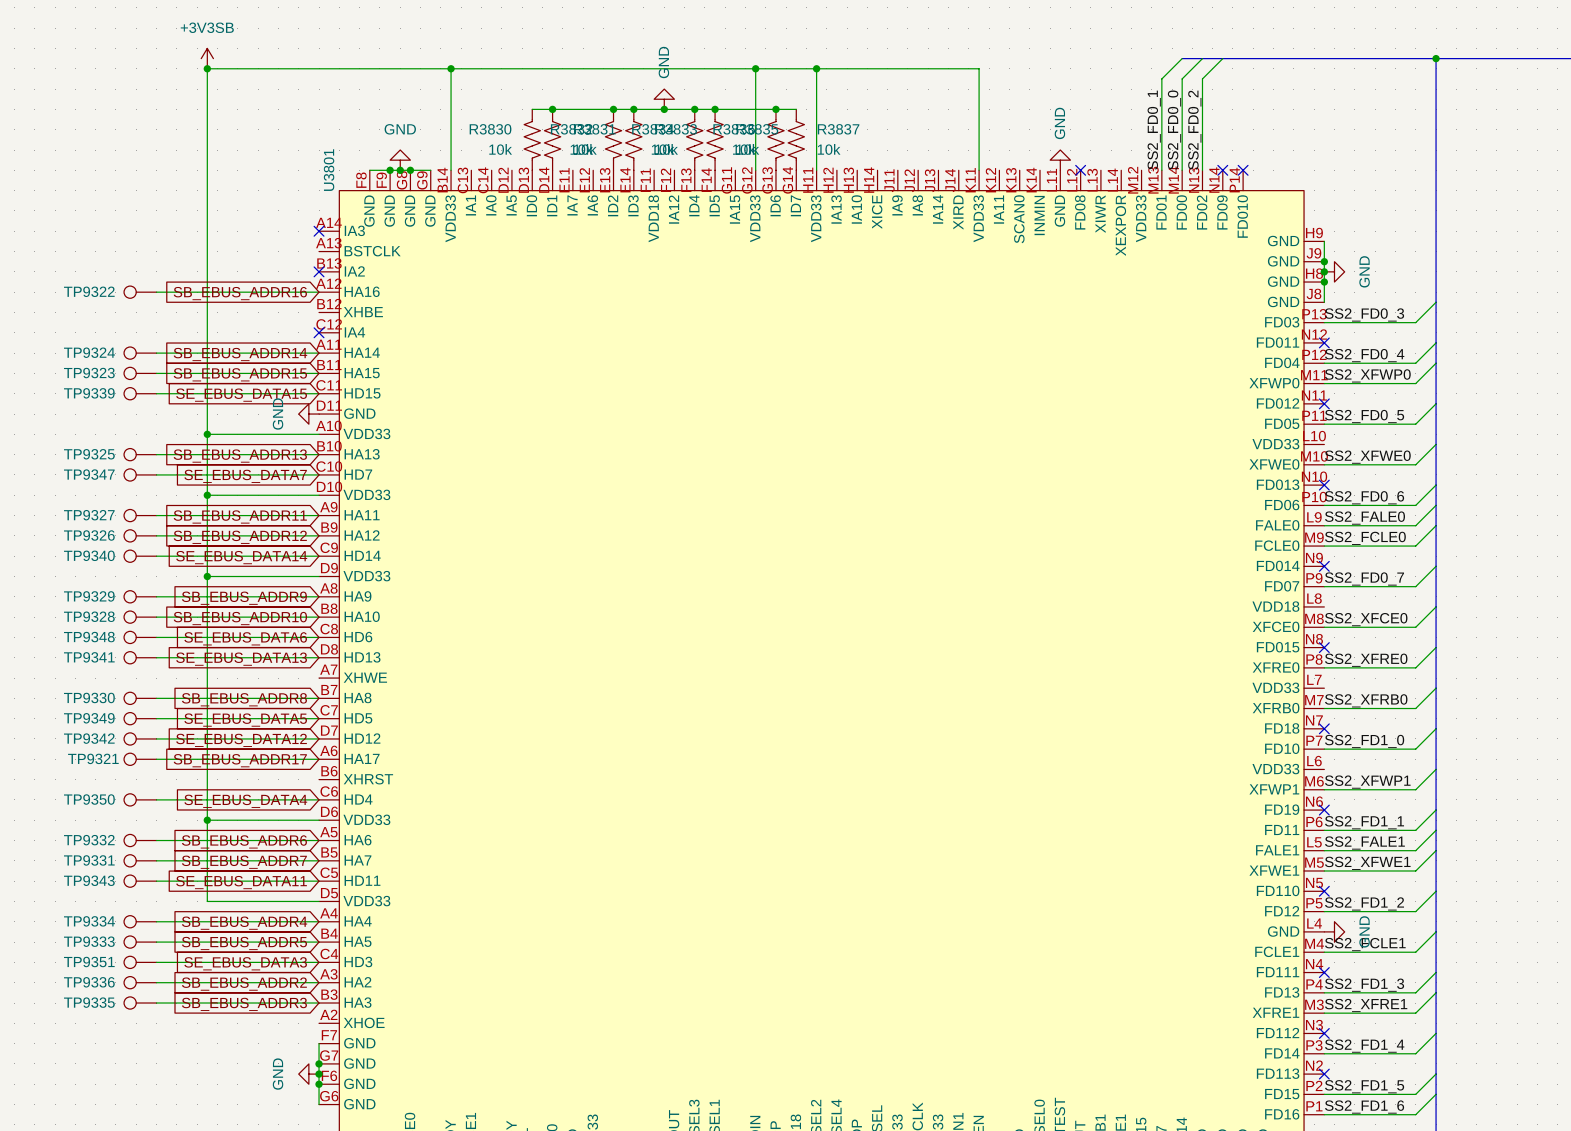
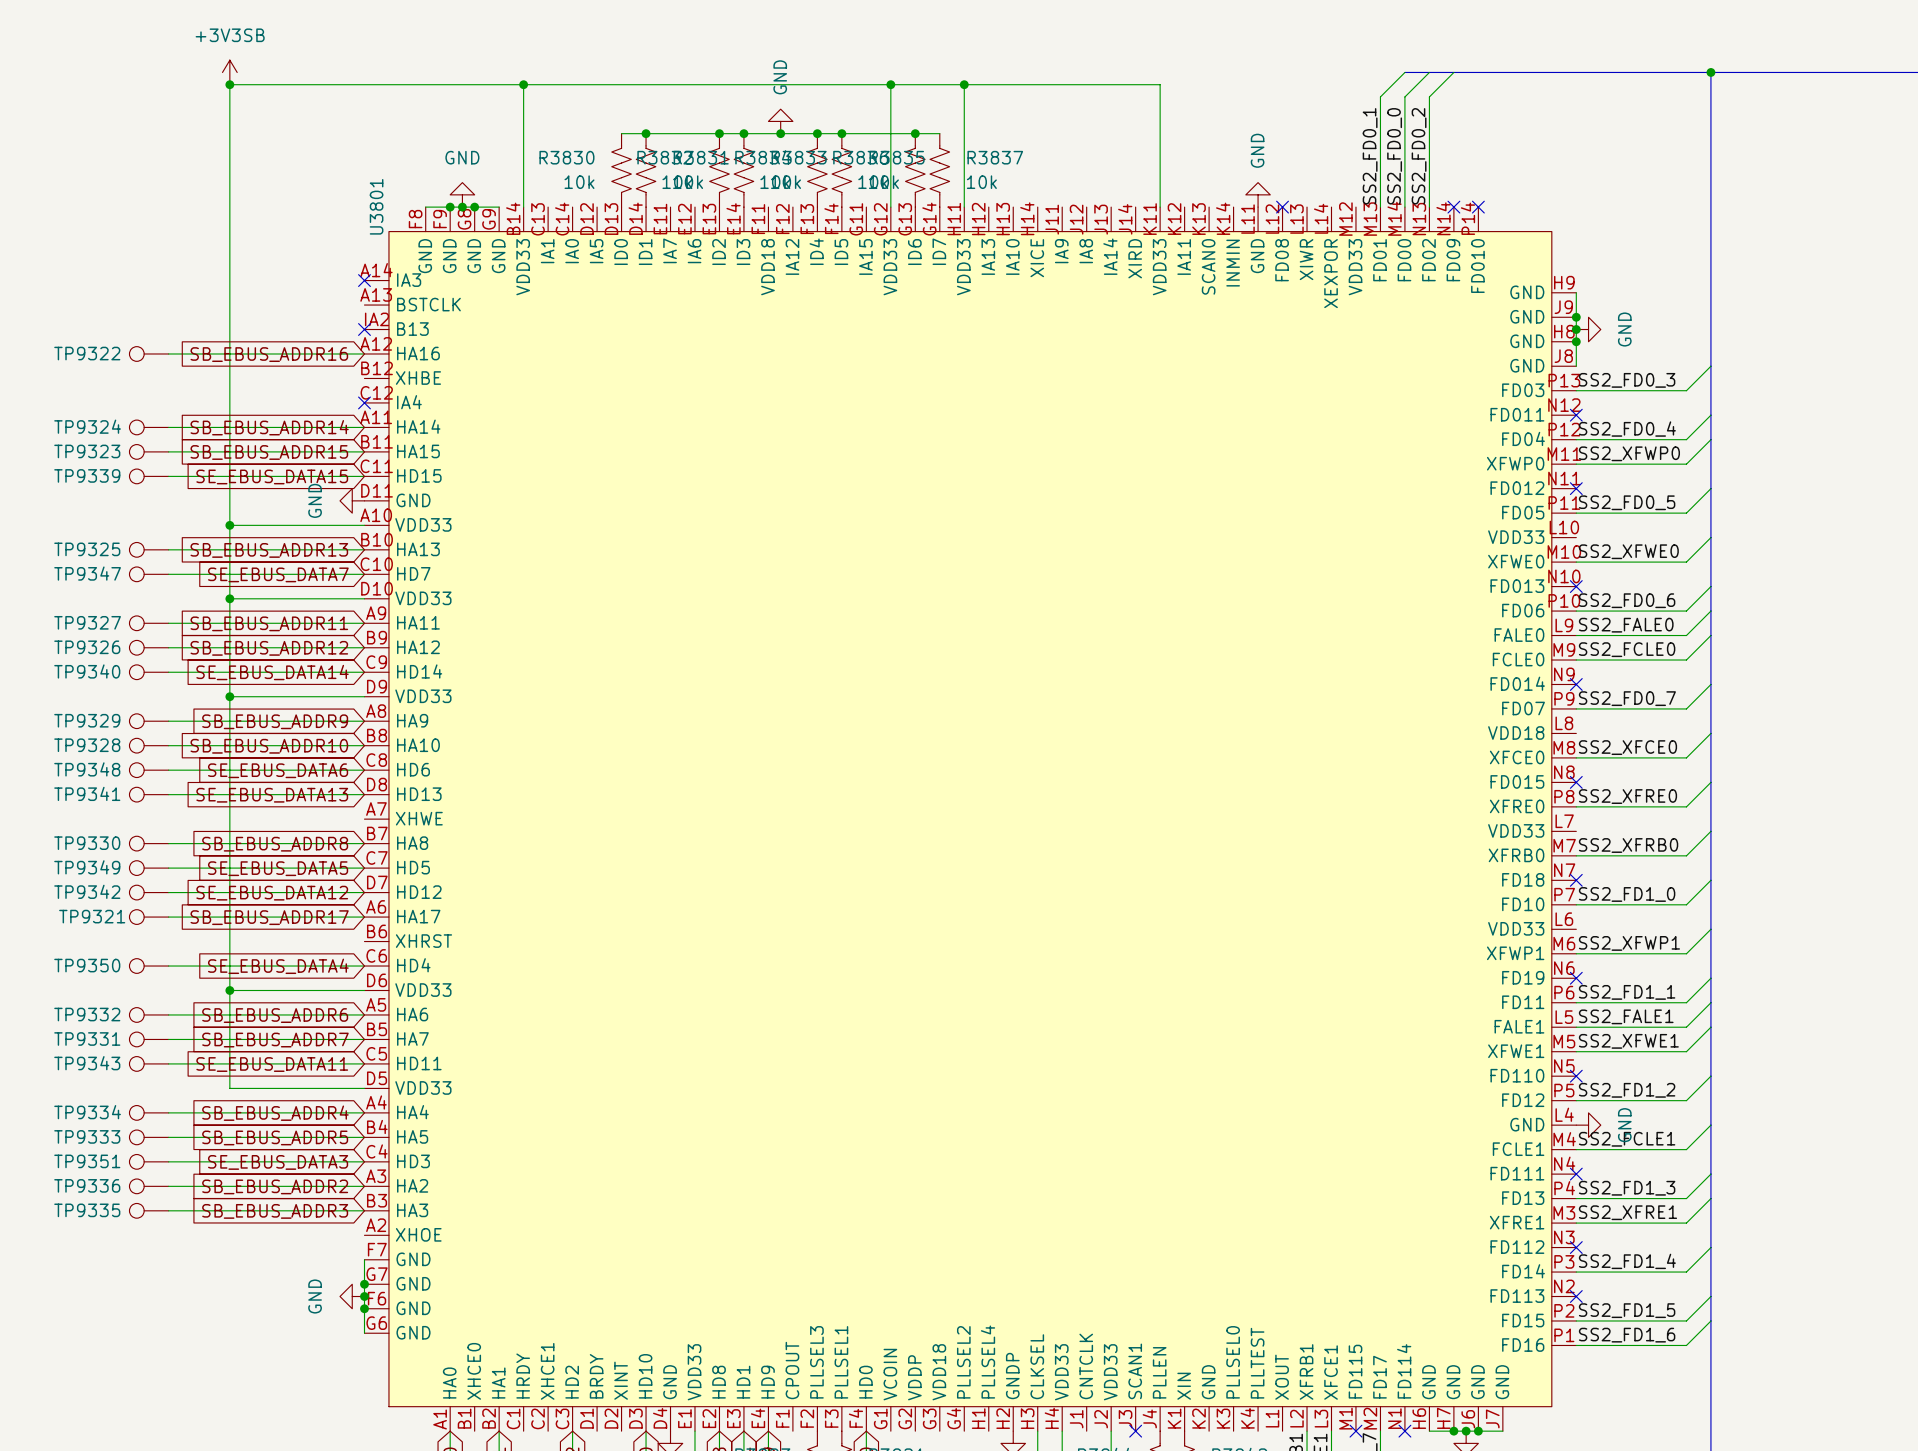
U3801 pin number: B13 (329, 263) -> IA2 (377, 319)
U3801 pin name: IA2 (354, 271) -> B13 (412, 329)

